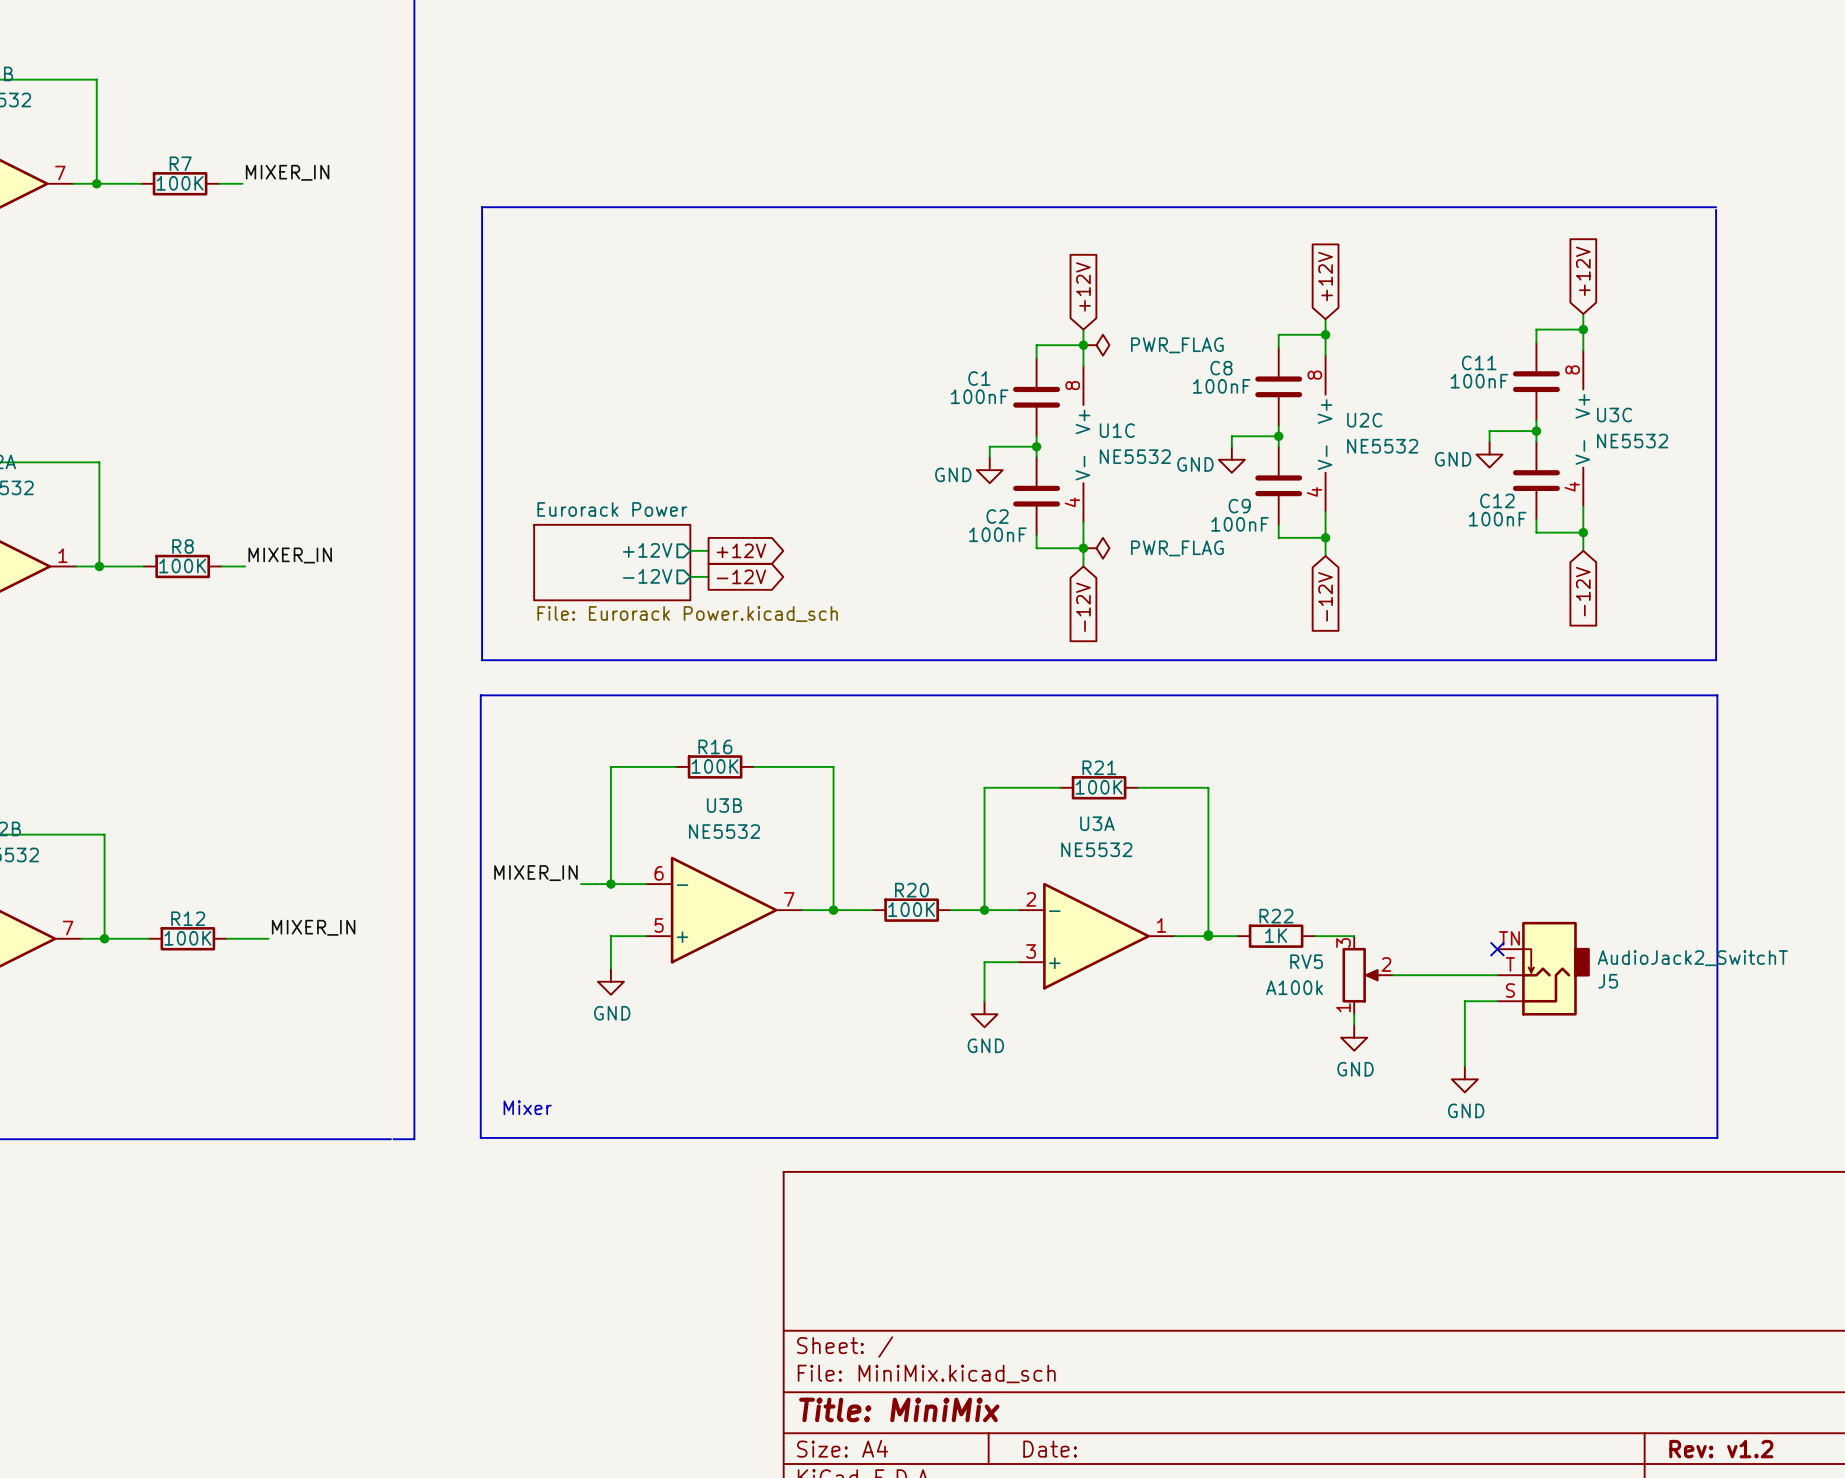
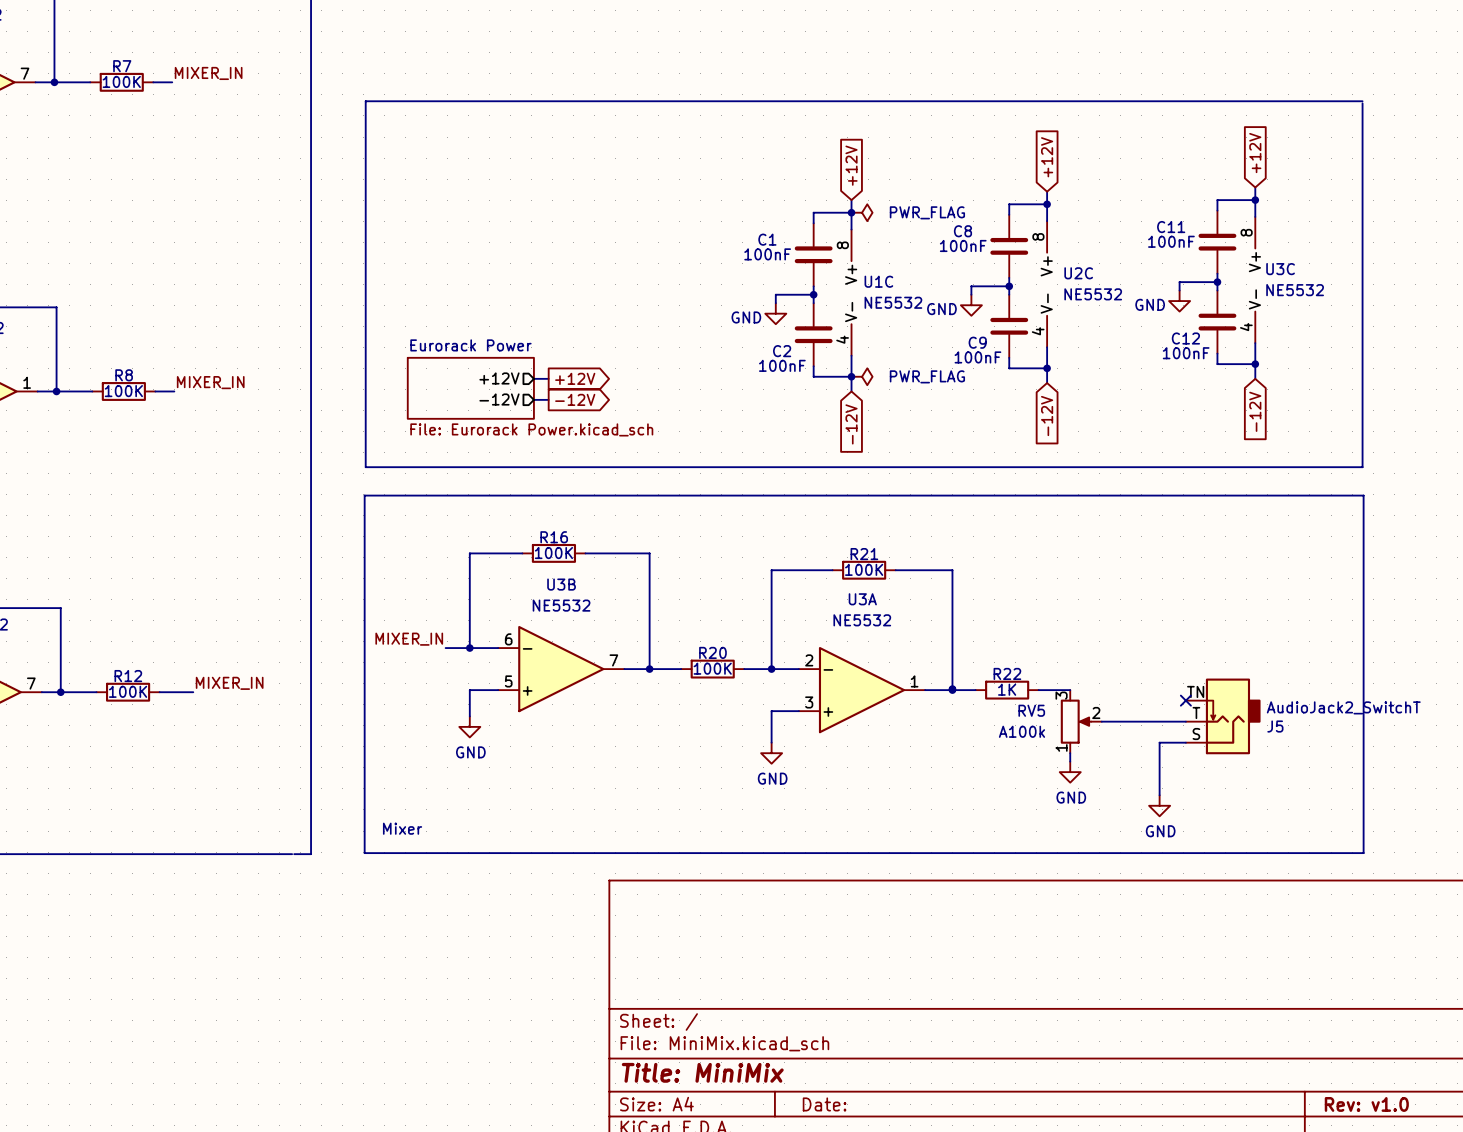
title block: Rev: v1.2 (1721, 1449) -> Rev: v1.0 (1366, 1104)

